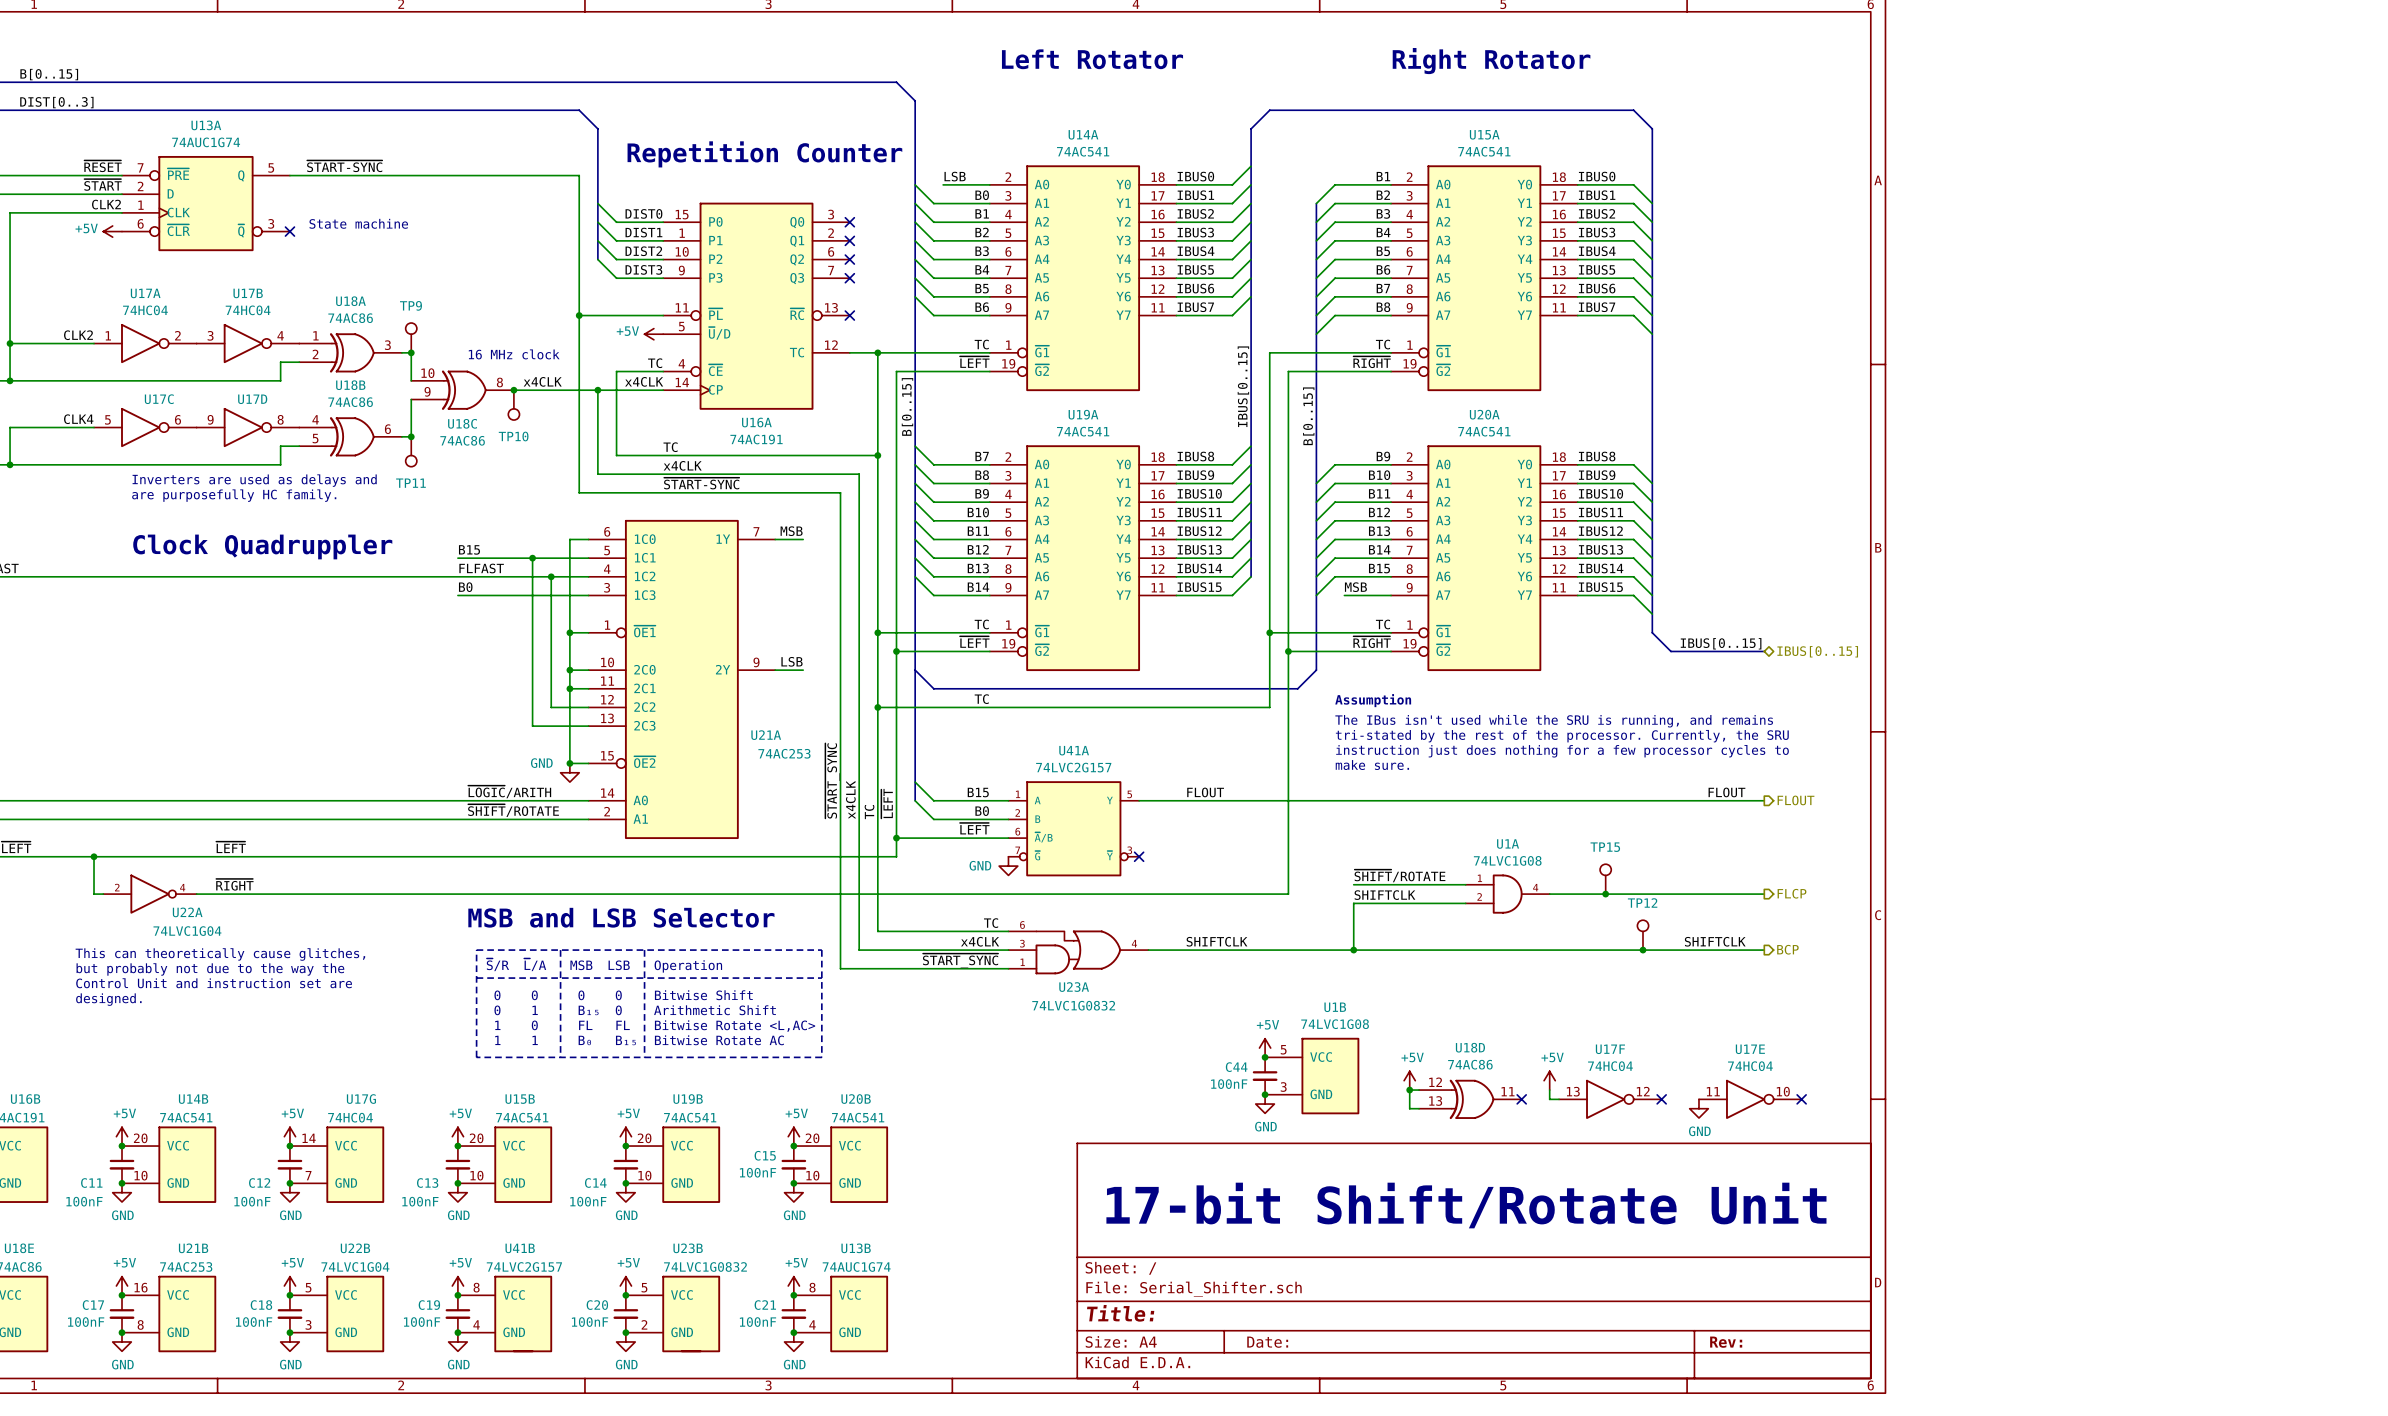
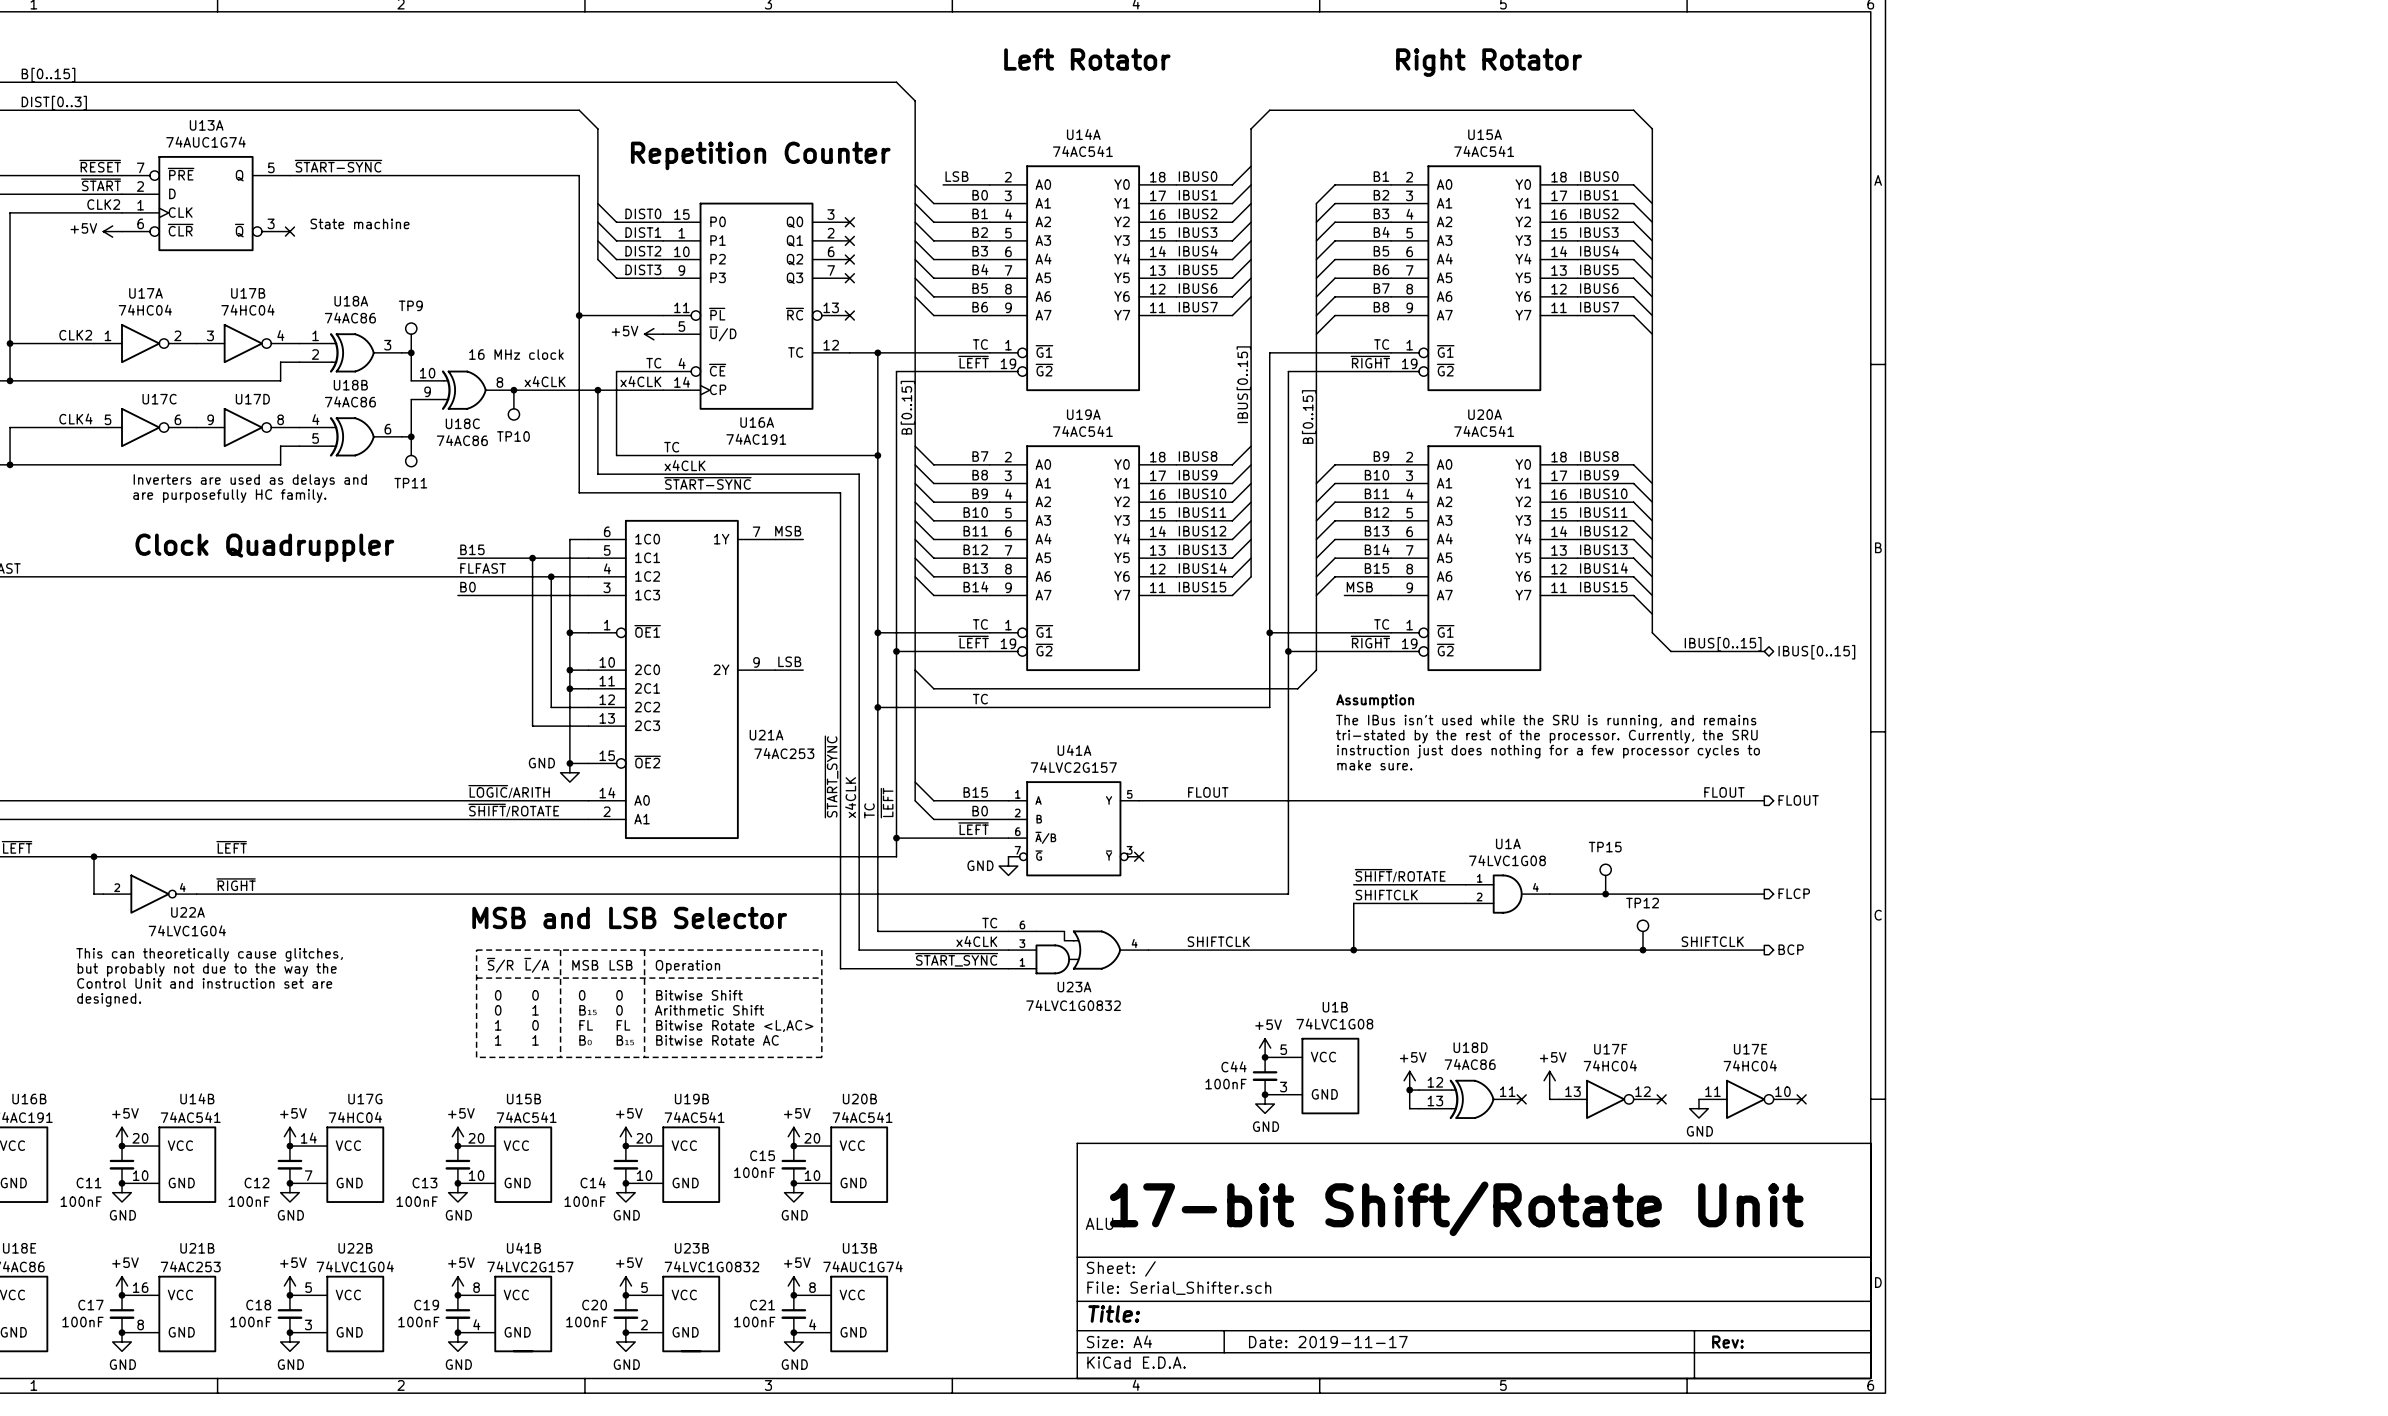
title block: none -> ALU (1099, 1223)
title block: Date: (1267, 1342) -> Date: 2019-11-17 (1328, 1342)

